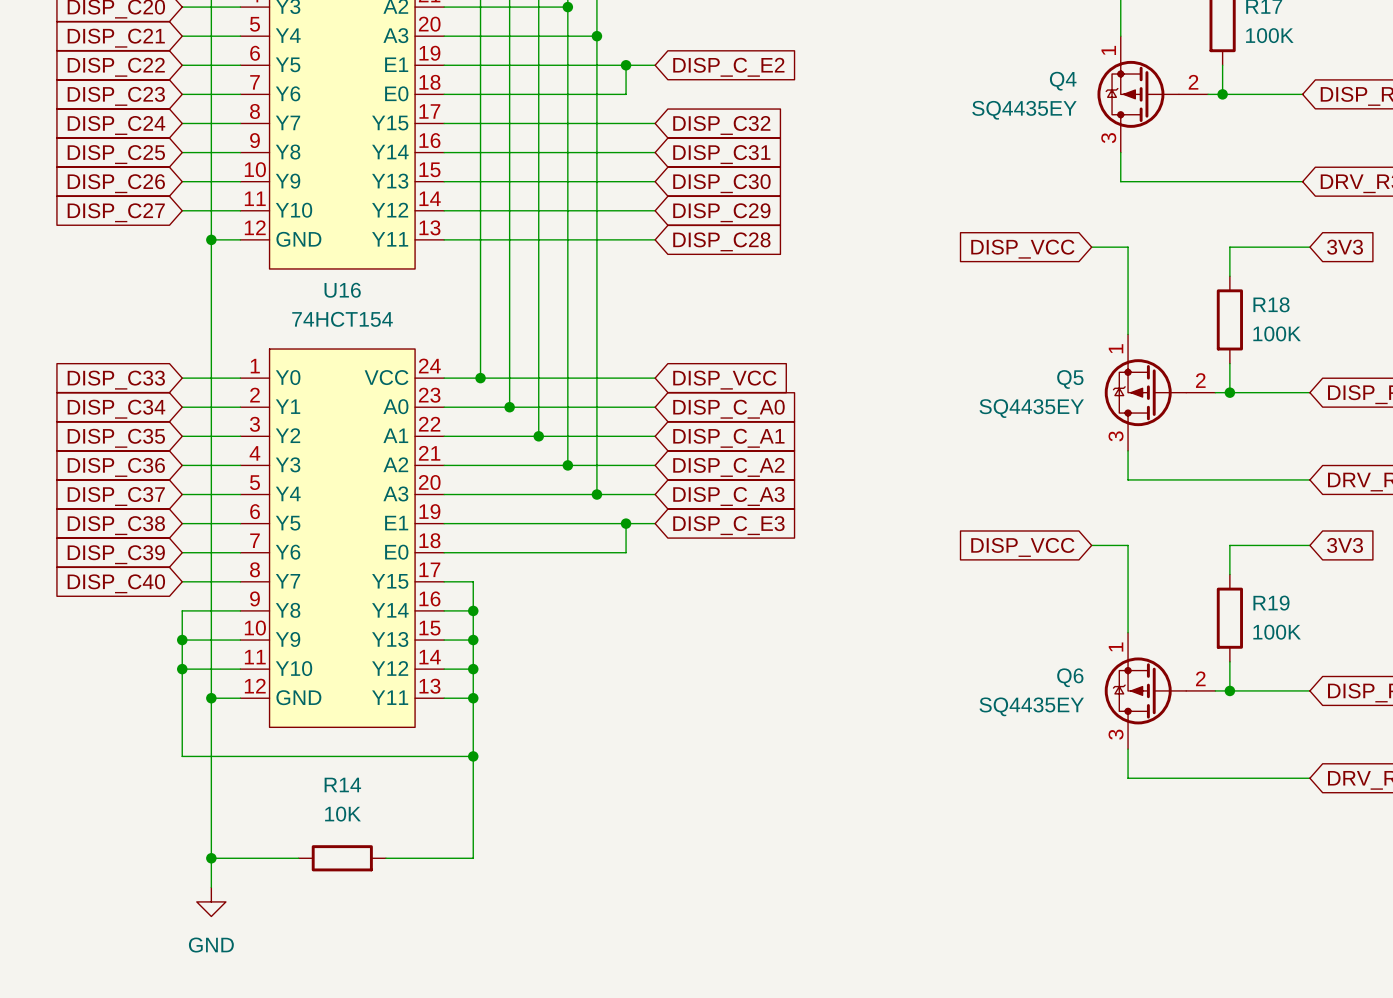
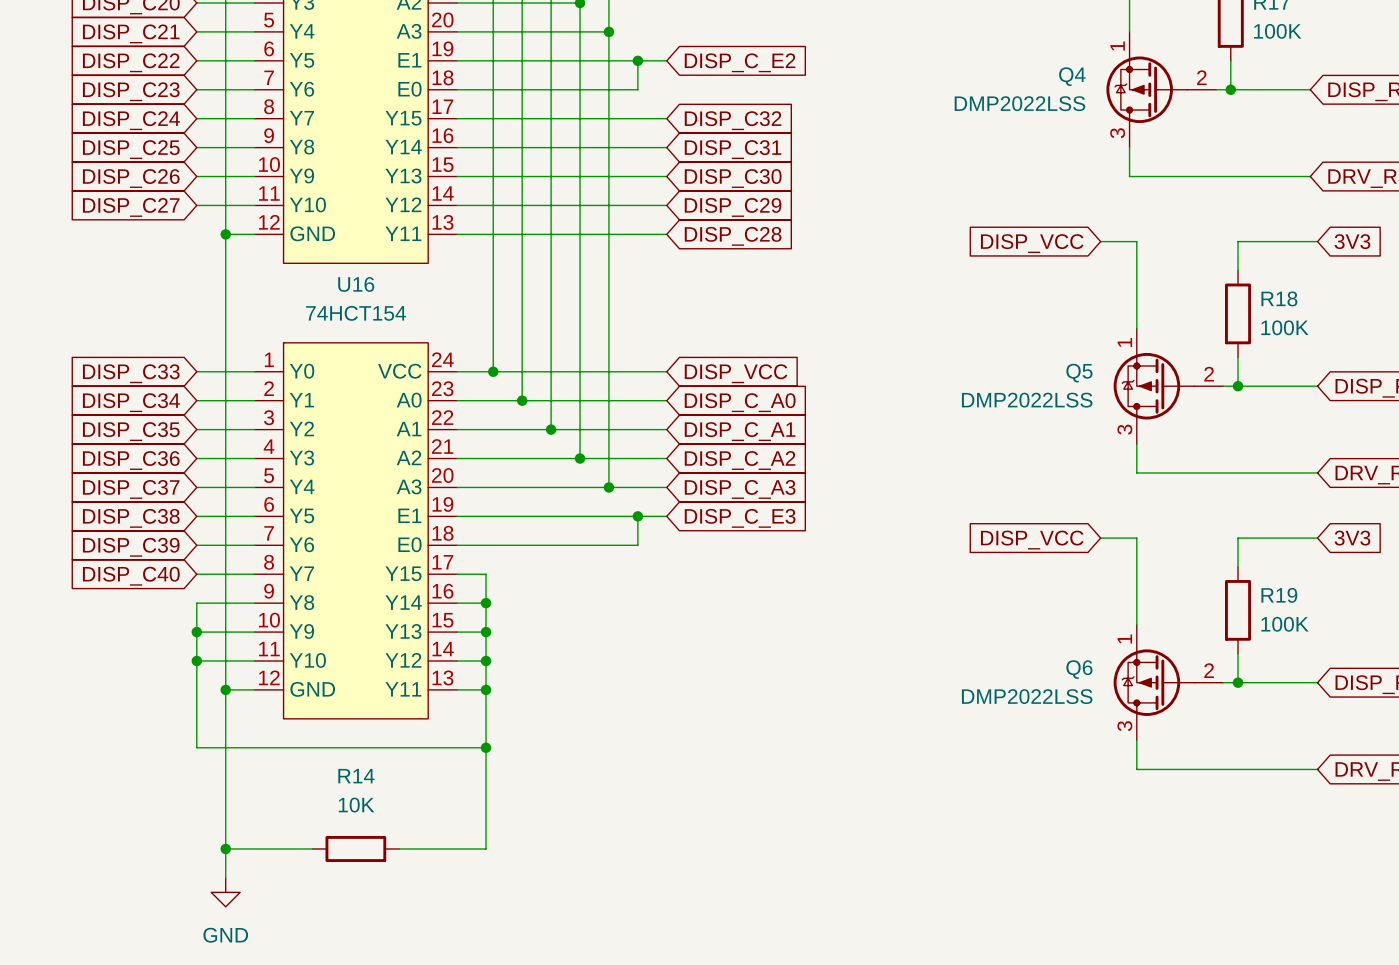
Q4 value: SQ4435EY (1024, 110) -> DMP2022LSS (1019, 103)
Q5 value: SQ4435EY (1031, 408) -> DMP2022LSS (1027, 400)
Q6 value: SQ4435EY (1031, 706) -> DMP2022LSS (1027, 696)

